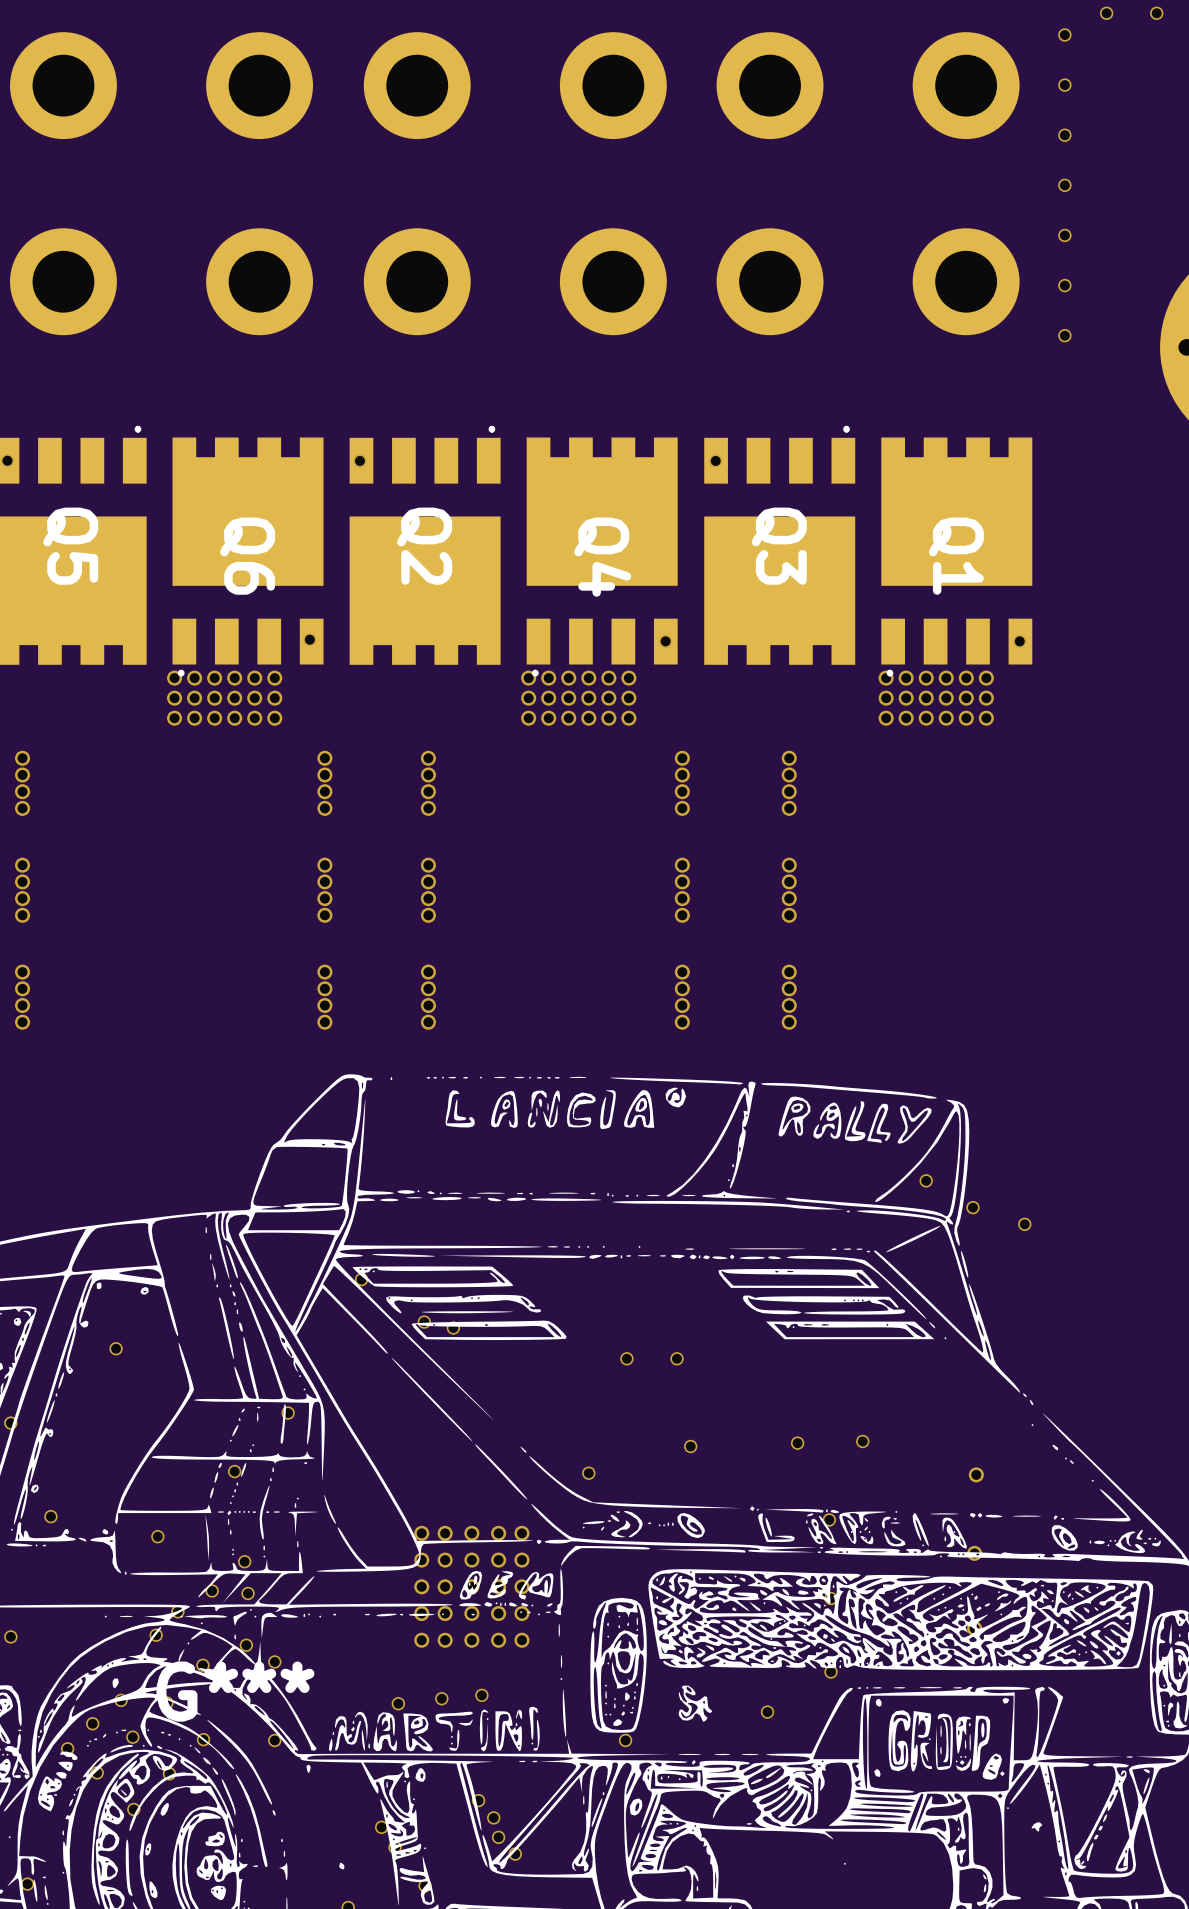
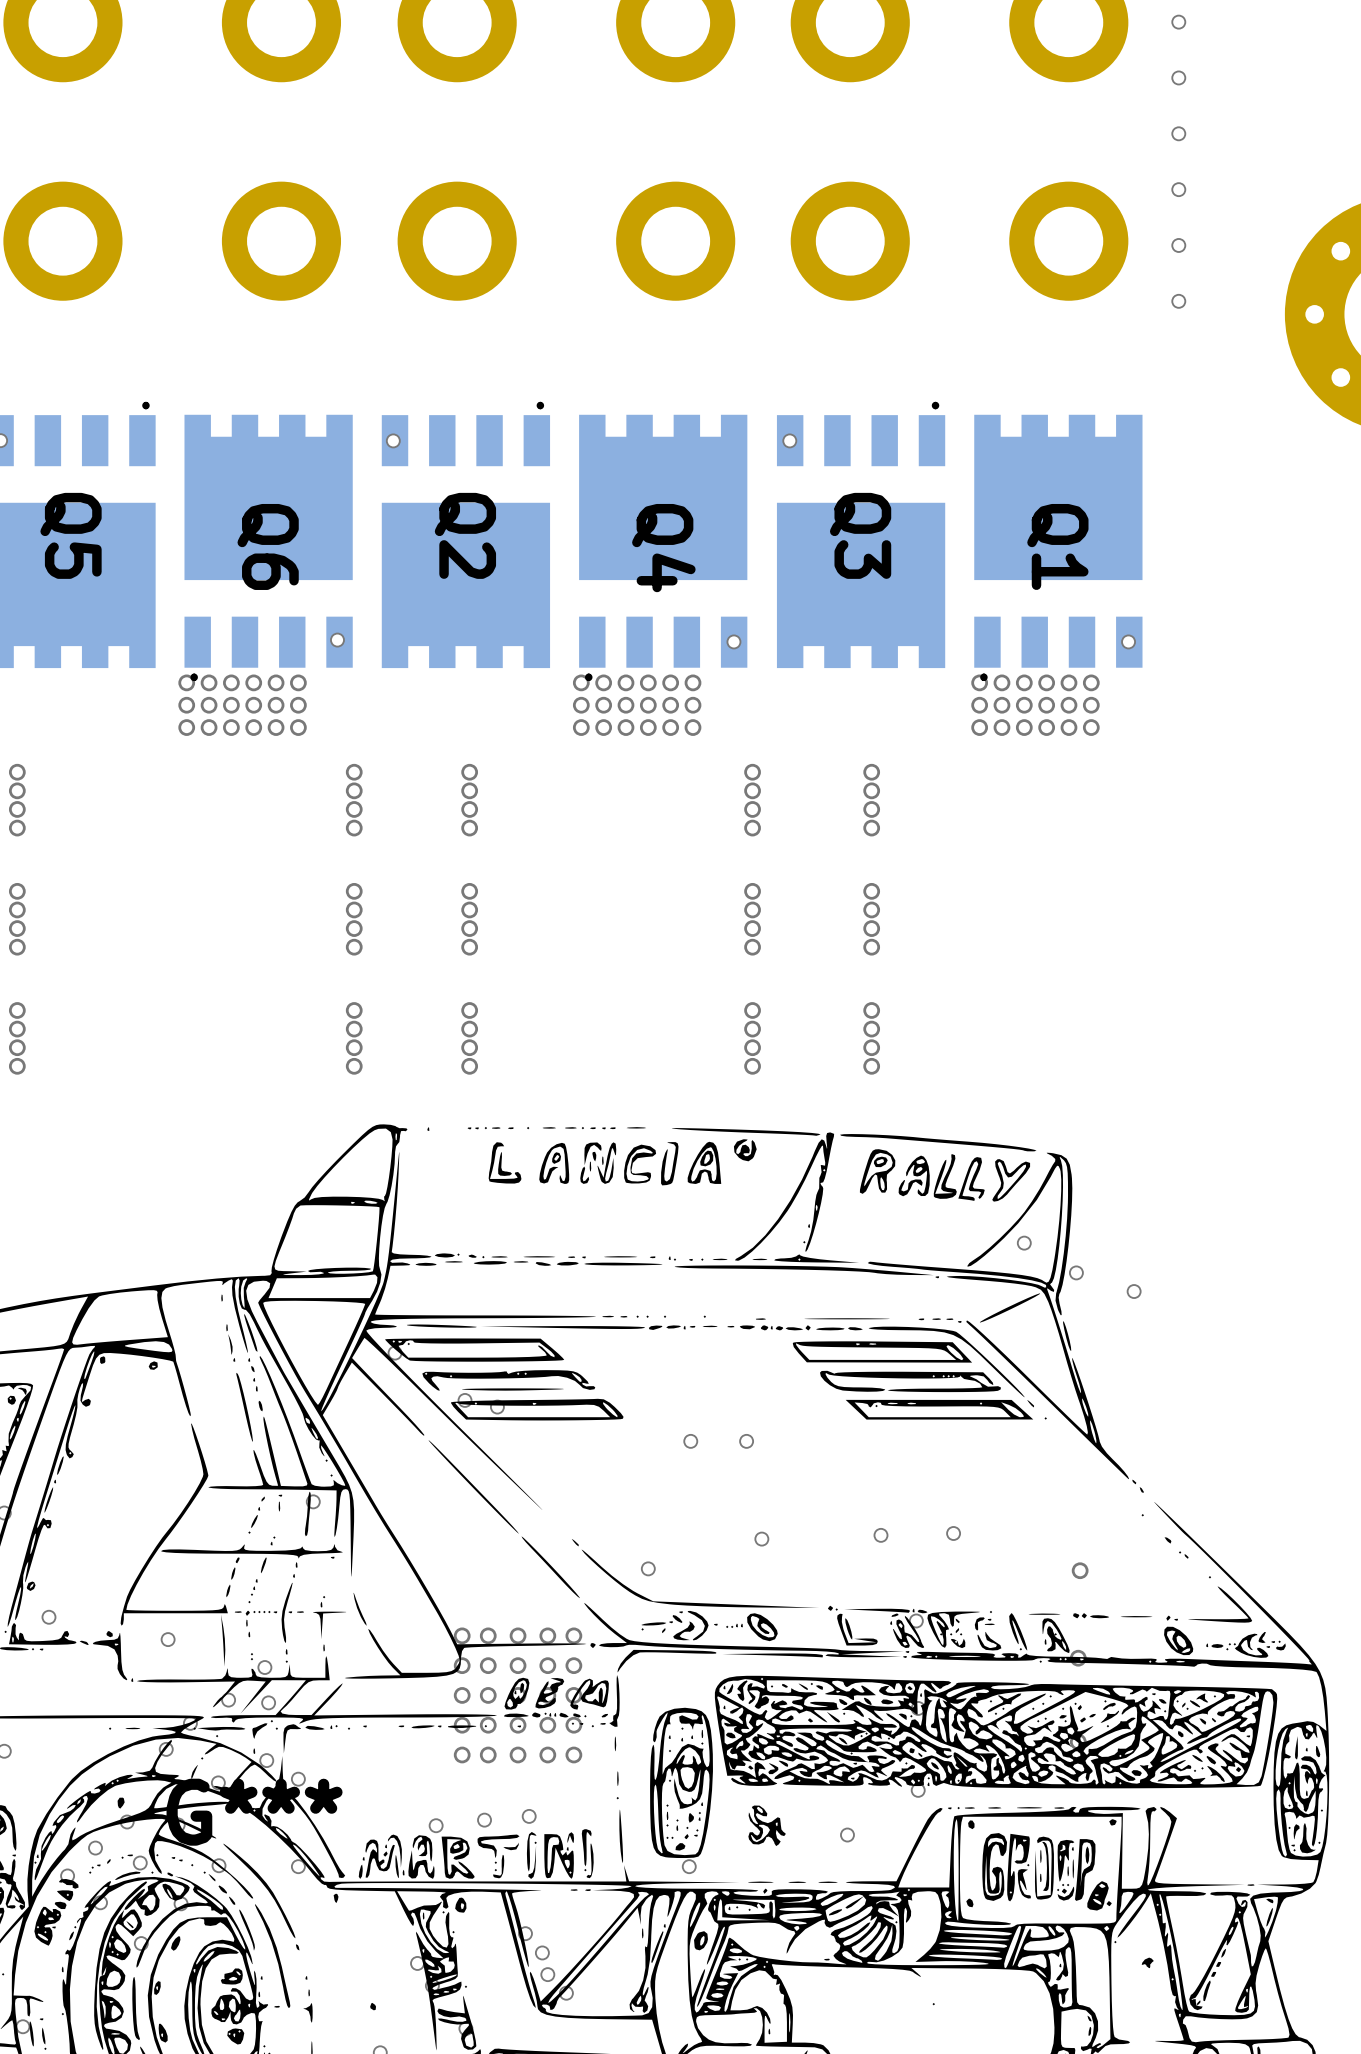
via: (116, 1348) -> none
via: (234, 1471) -> none

